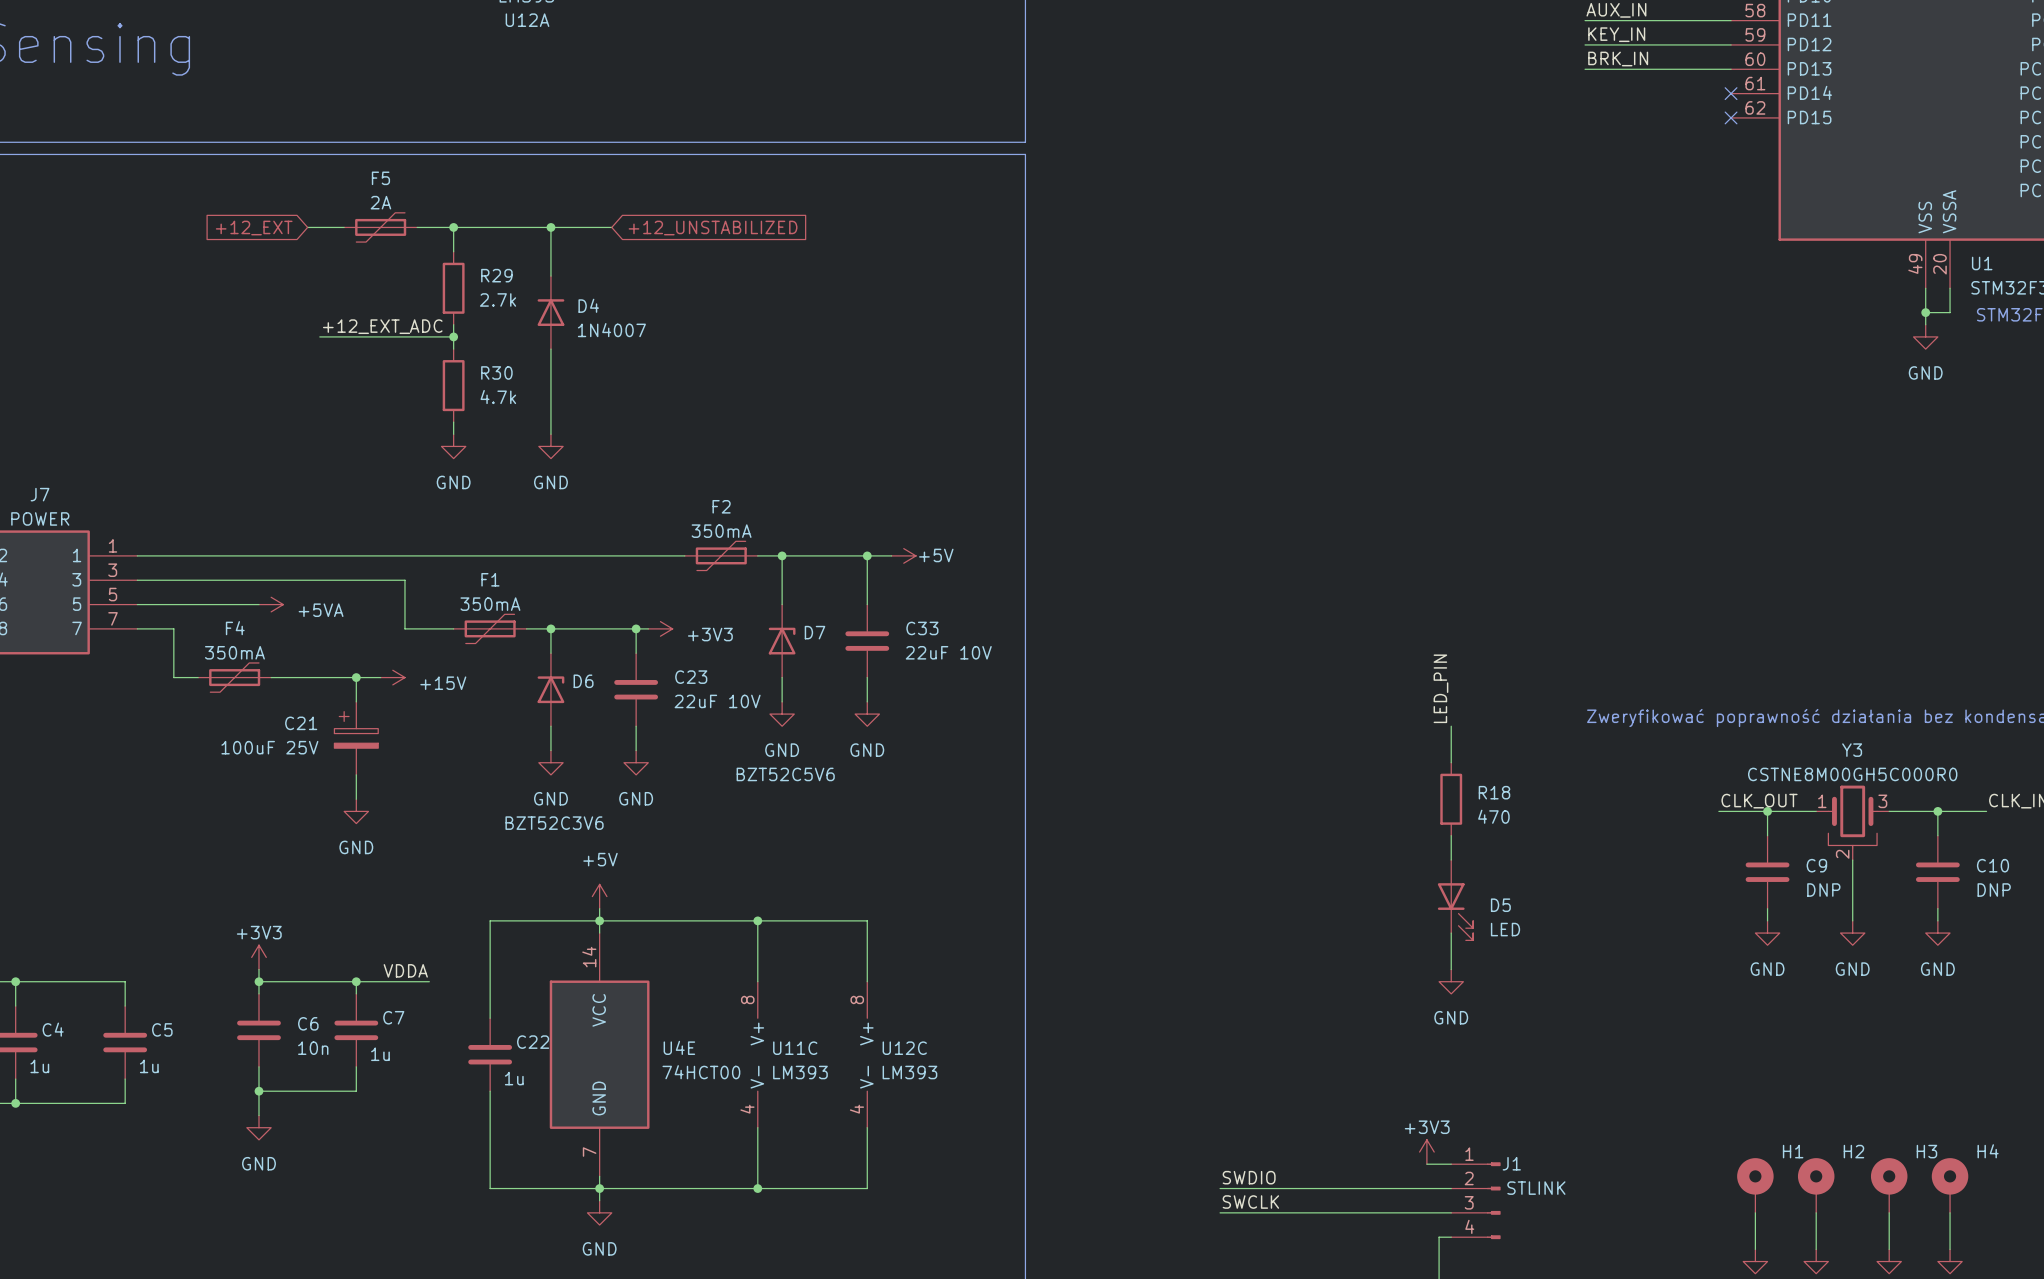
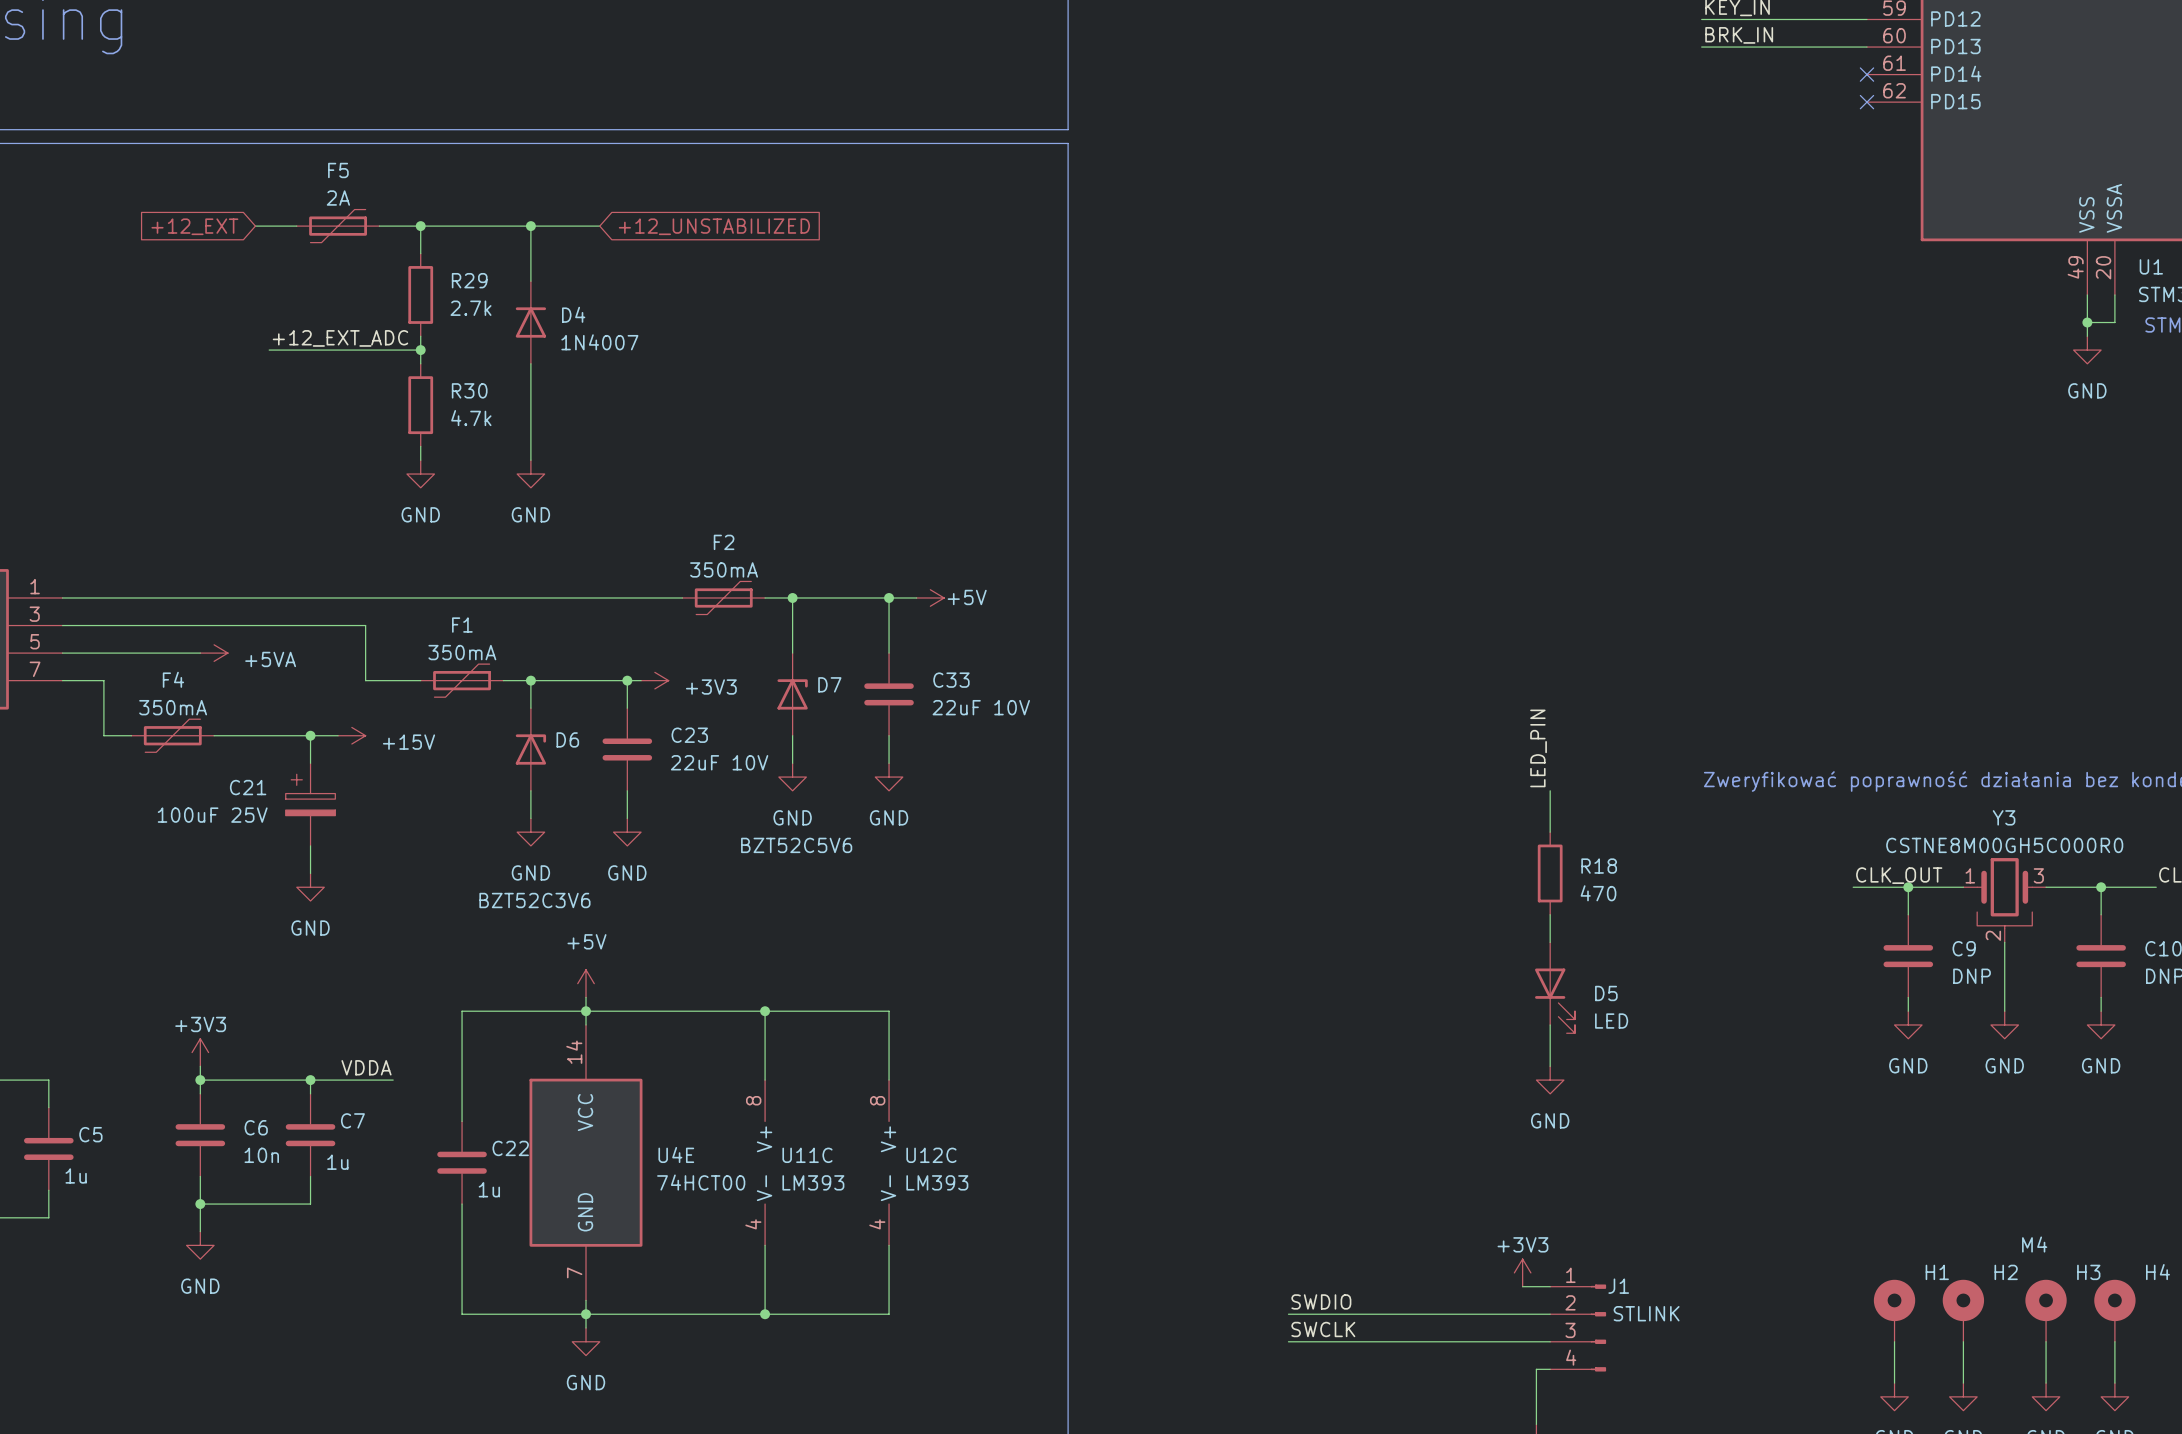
H1 value: none -> M4 (2034, 1244)

